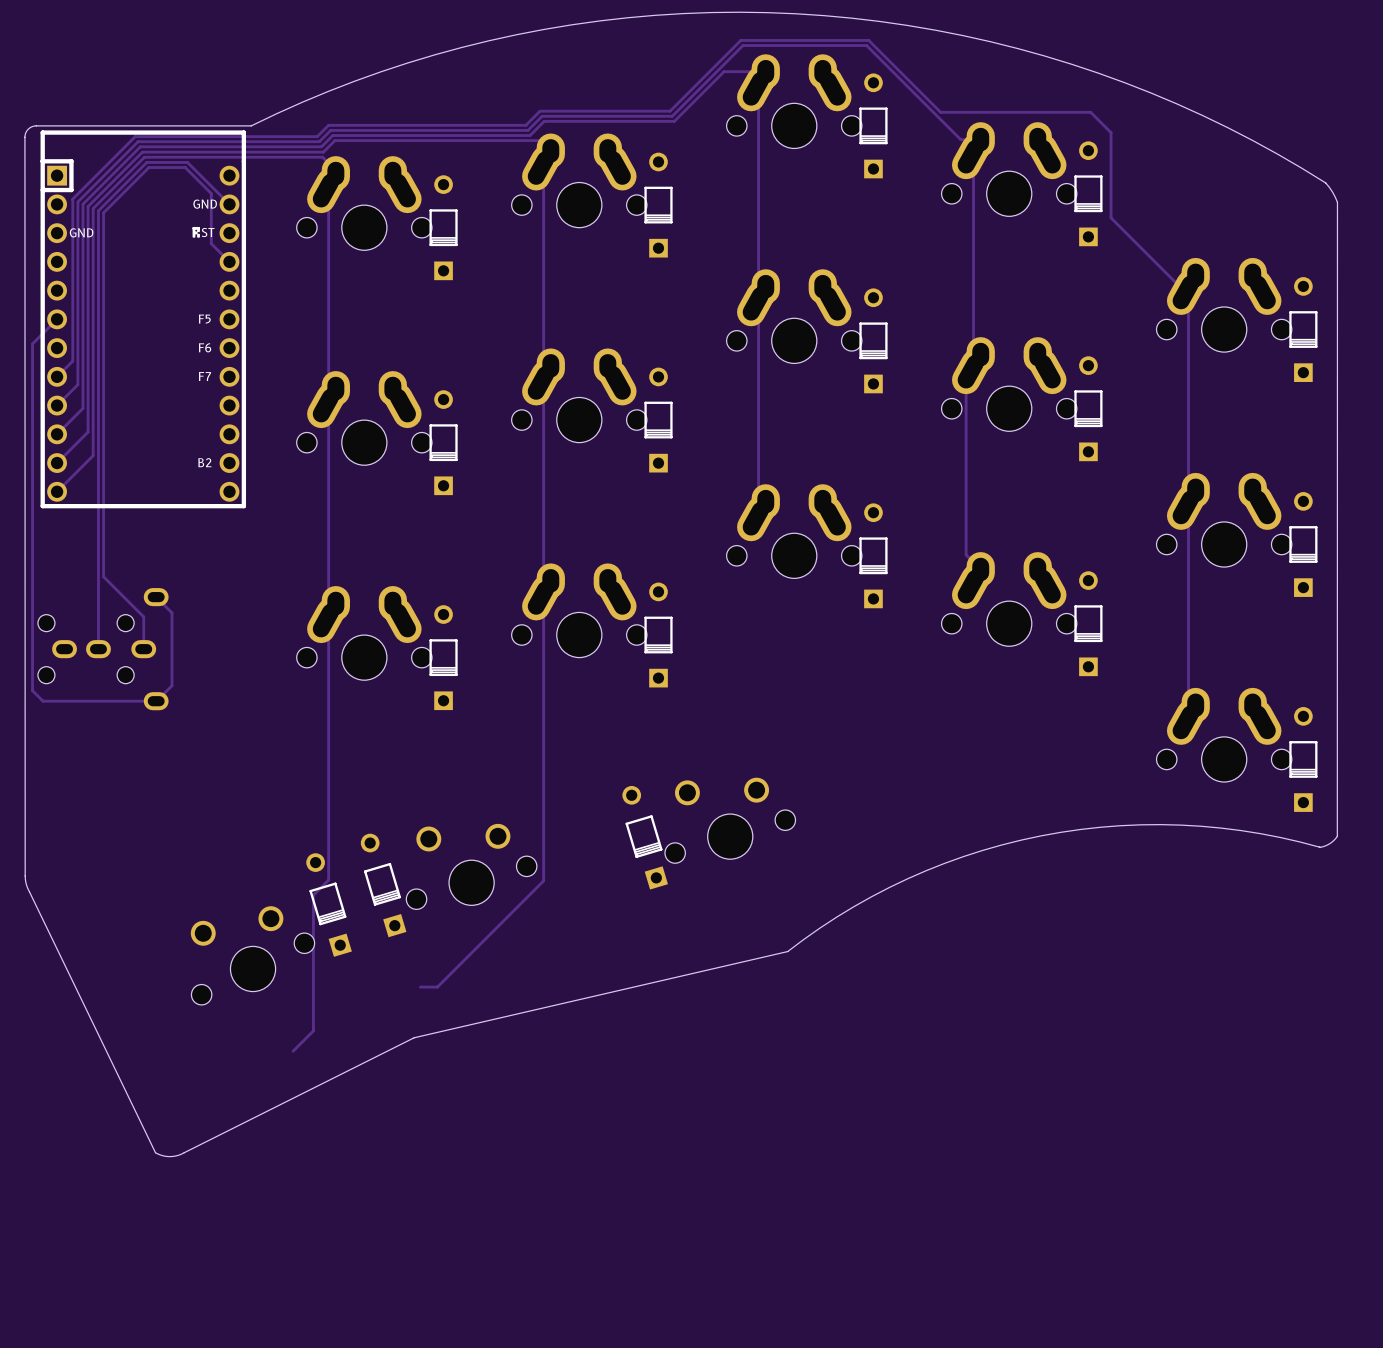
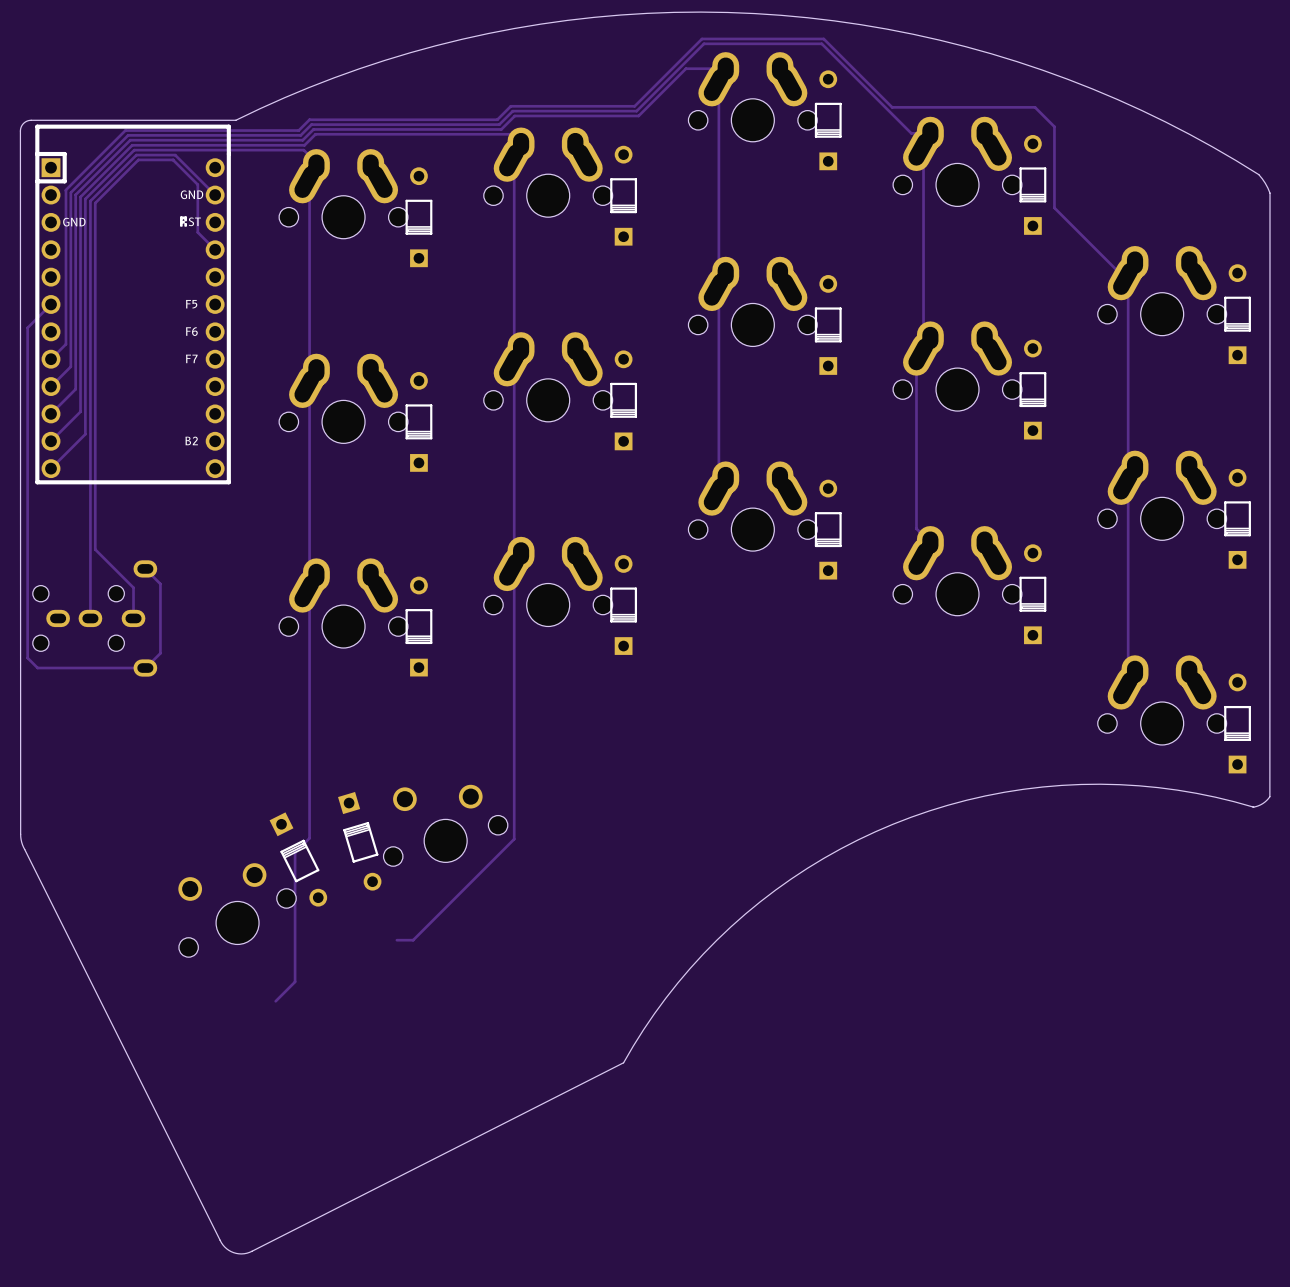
part: (730, 820) -> none
part: (645, 837) -> none
board edge: (1319, 847) (1240, 830) (1160, 824) (1080, 829) (1001, 844) (944, 863) (889, 887) (836, 916) (787, 951) (414, 1037) (181, 1154) (169, 1156) (155, 1152) (29, 891) -> (1252, 806) (1196, 793) (1158, 787) (1119, 784) (1061, 785) (1004, 792) (966, 800) (929, 810) (875, 831) (807, 868) (775, 890) (730, 926) (690, 968) (665, 998) (623, 1062) (252, 1251) (241, 1253) (228, 1250) (221, 1242) (24, 849)
part rotation: 0° (383, 885) -> 180° (359, 841)
part: none -> (298, 859)
part: (329, 905) -> none

